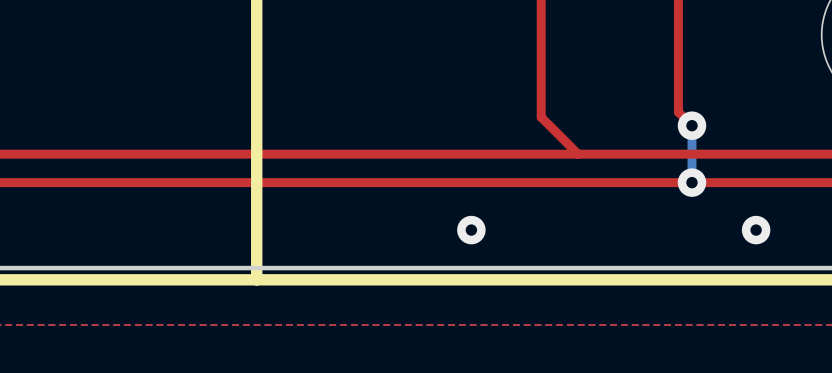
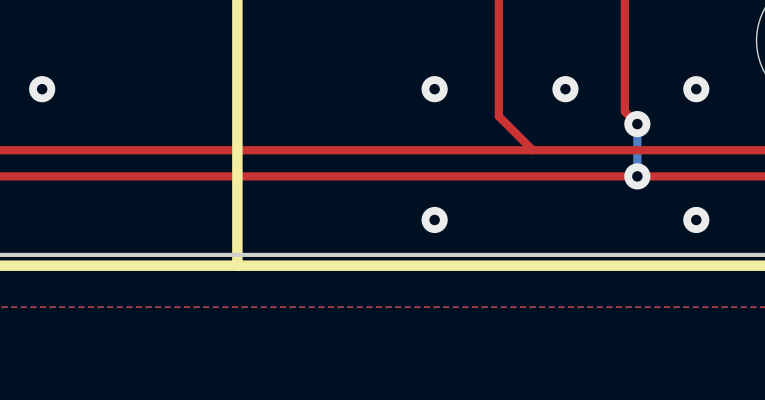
via: none -> (42, 89)
via: none -> (434, 89)
via: none -> (565, 89)
via: none -> (696, 89)

